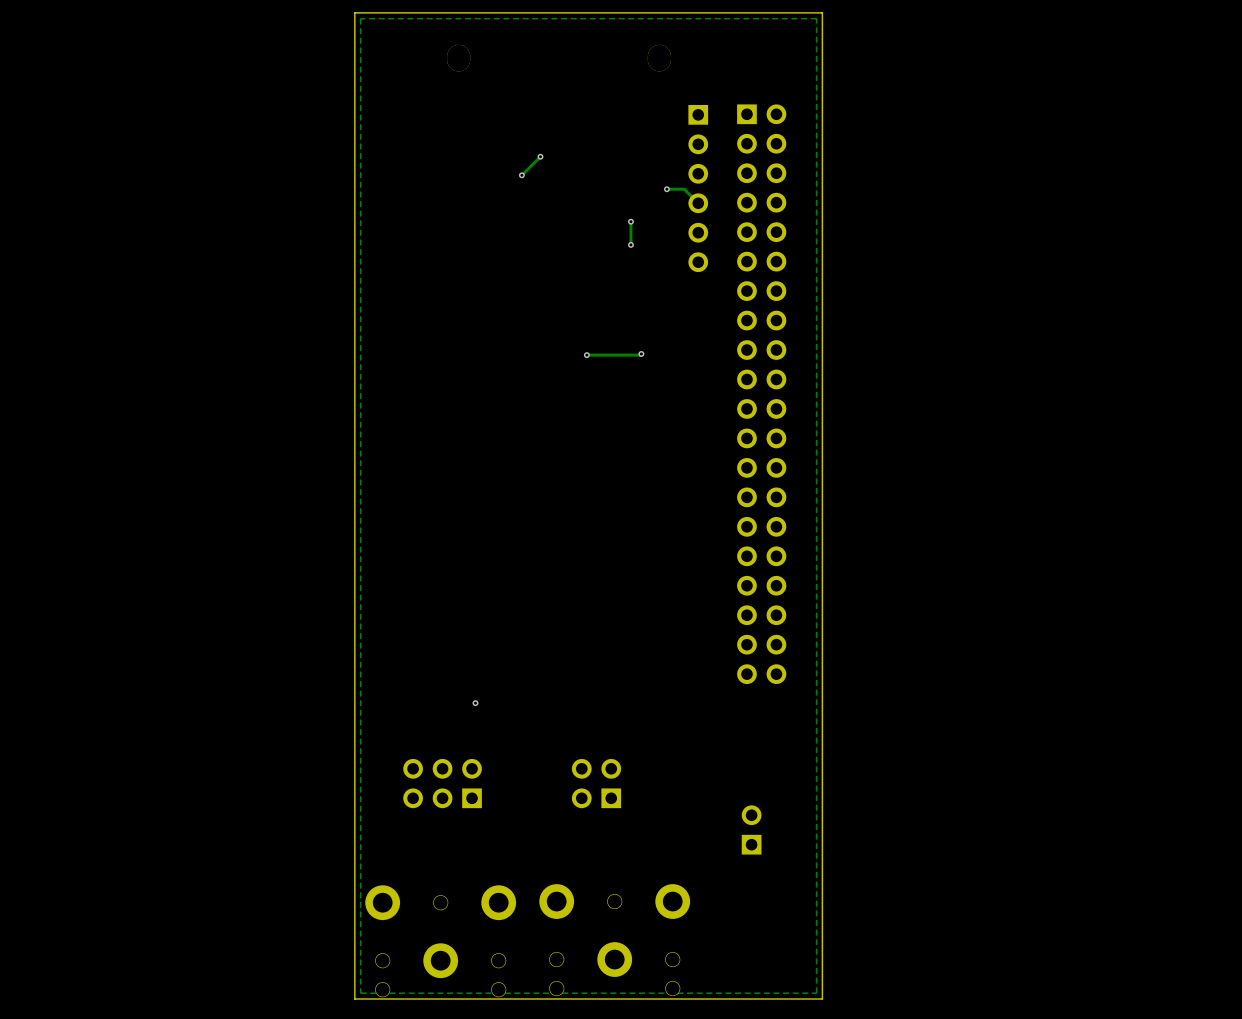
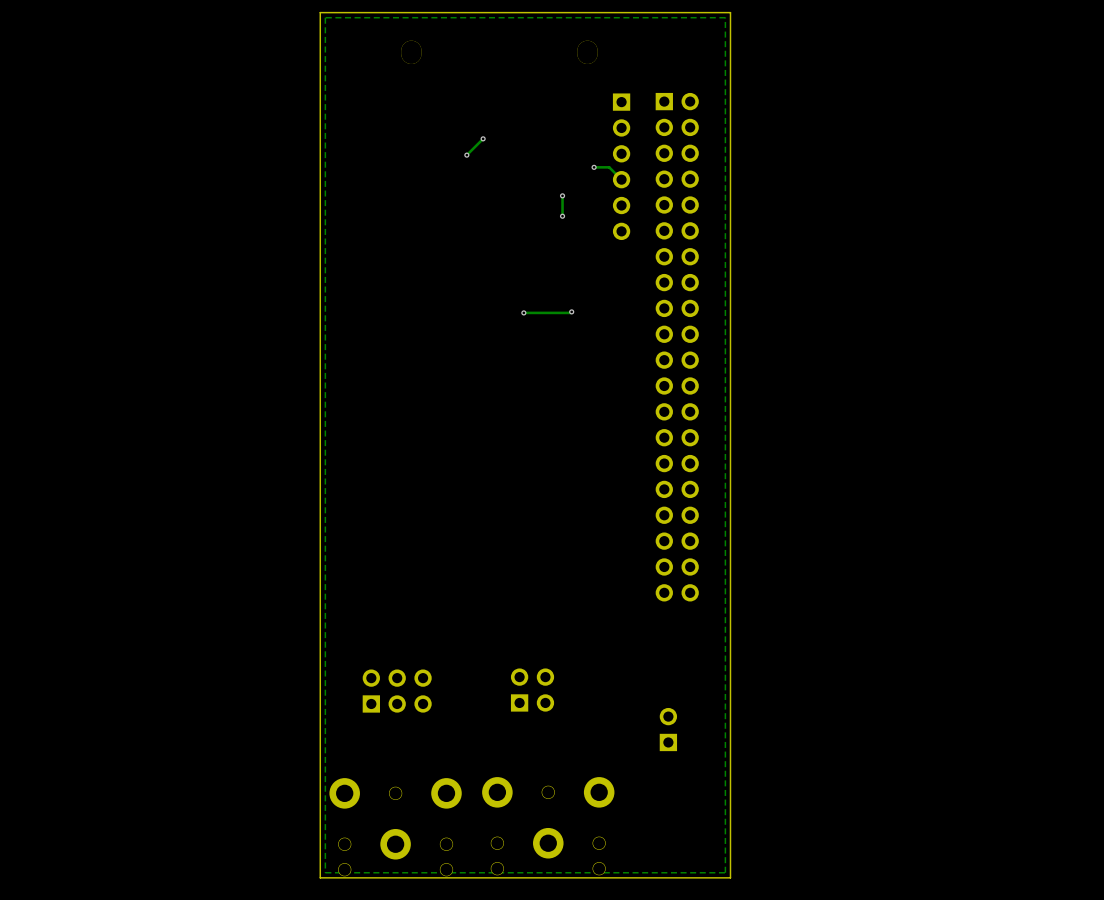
via: (475, 703) -> none
part footprint: [403, 758, 482, 809] -> [362, 669, 432, 713]
part rotation: 0° (596, 783) -> 90° clockwise (532, 690)

